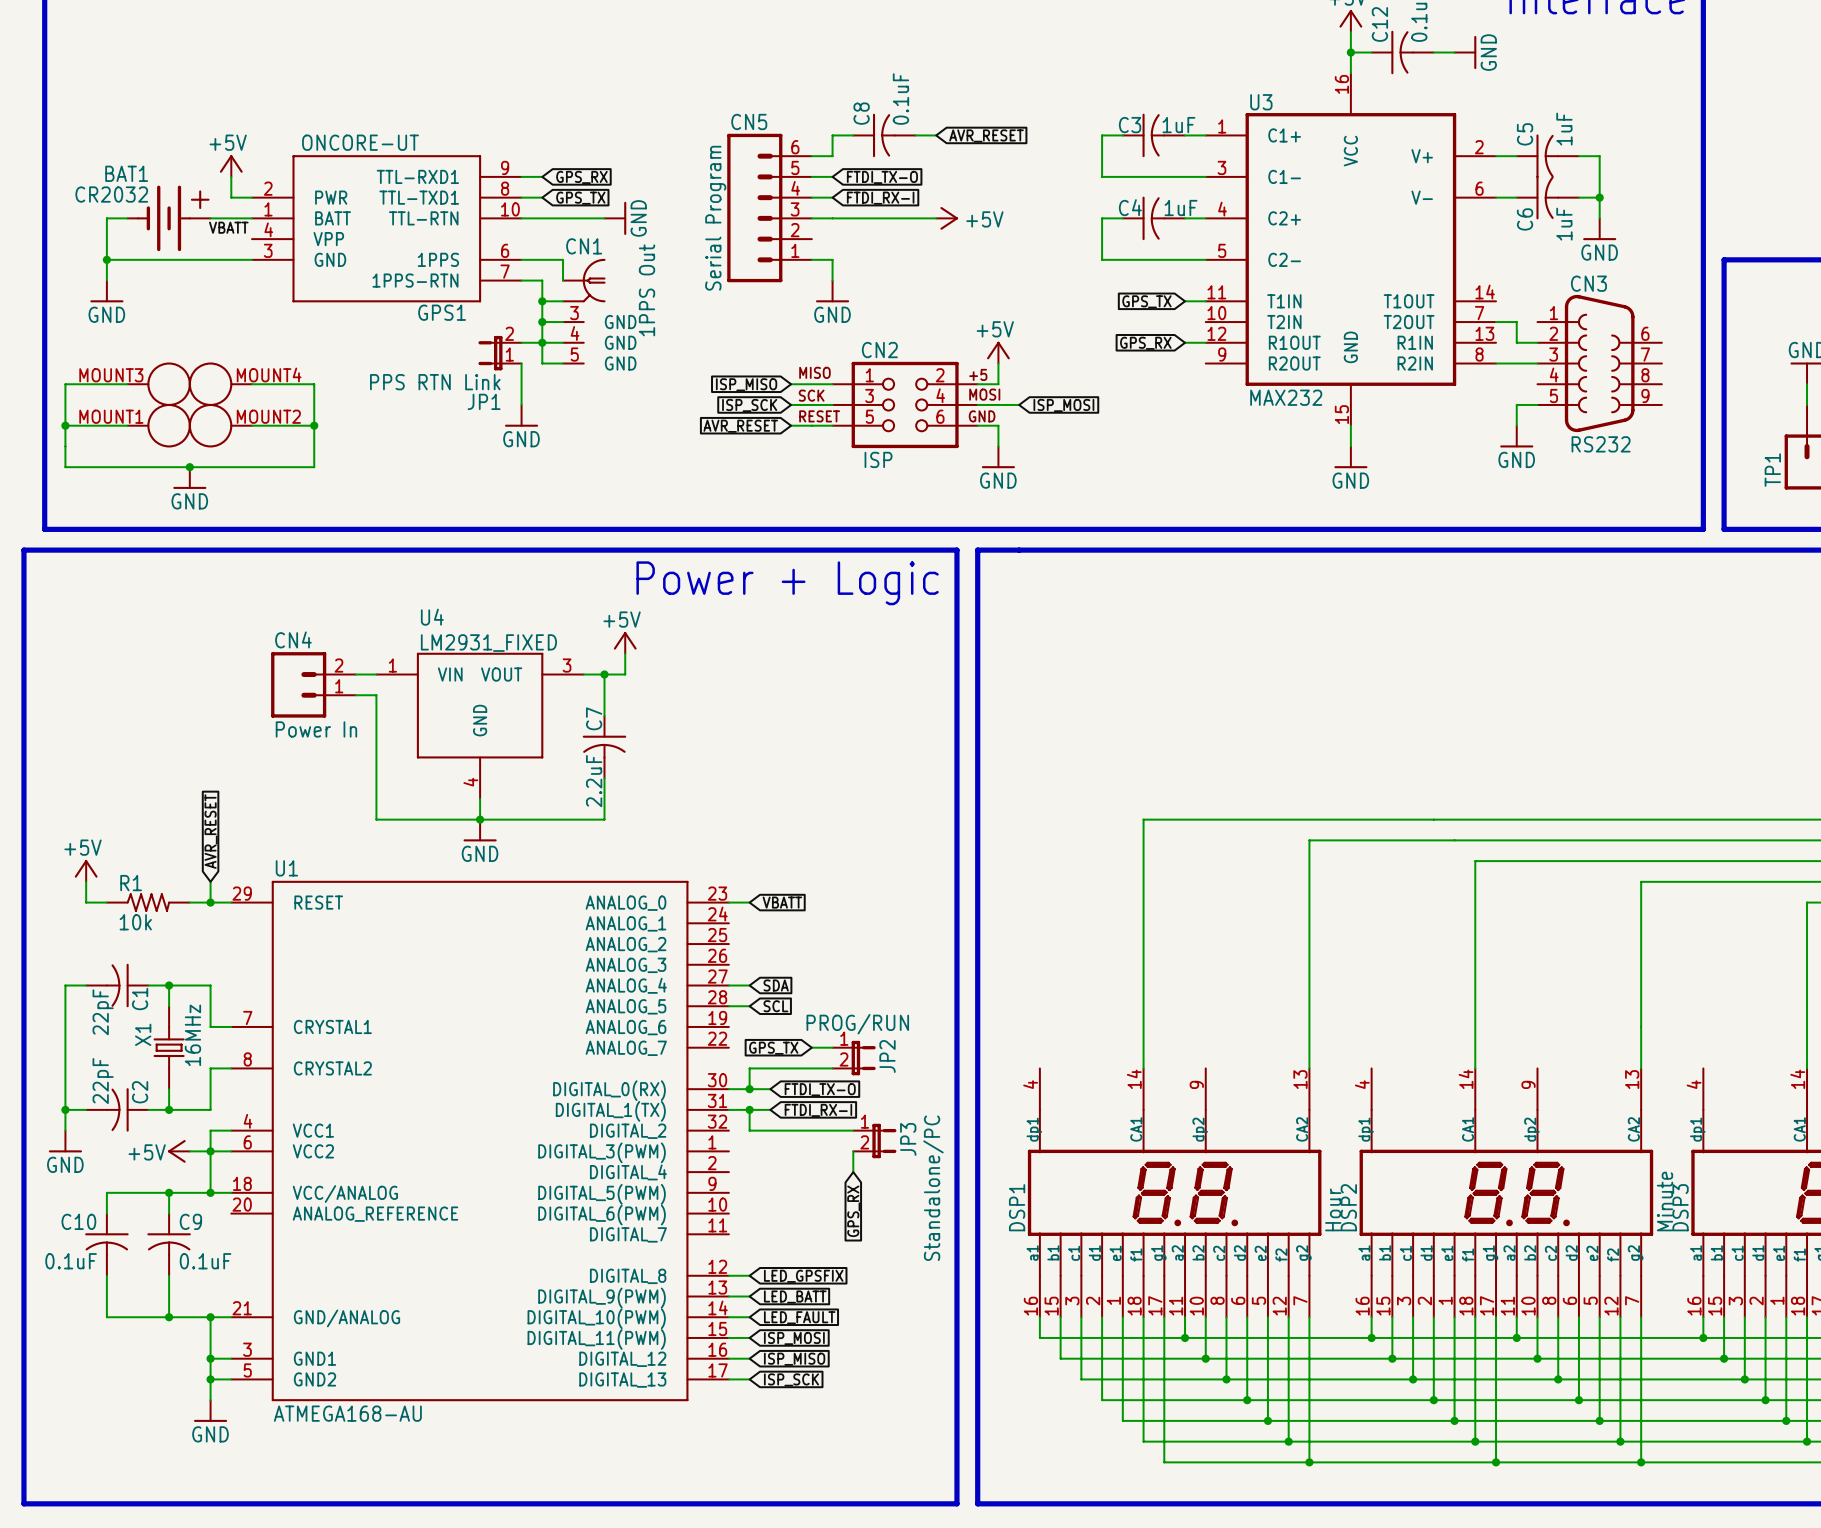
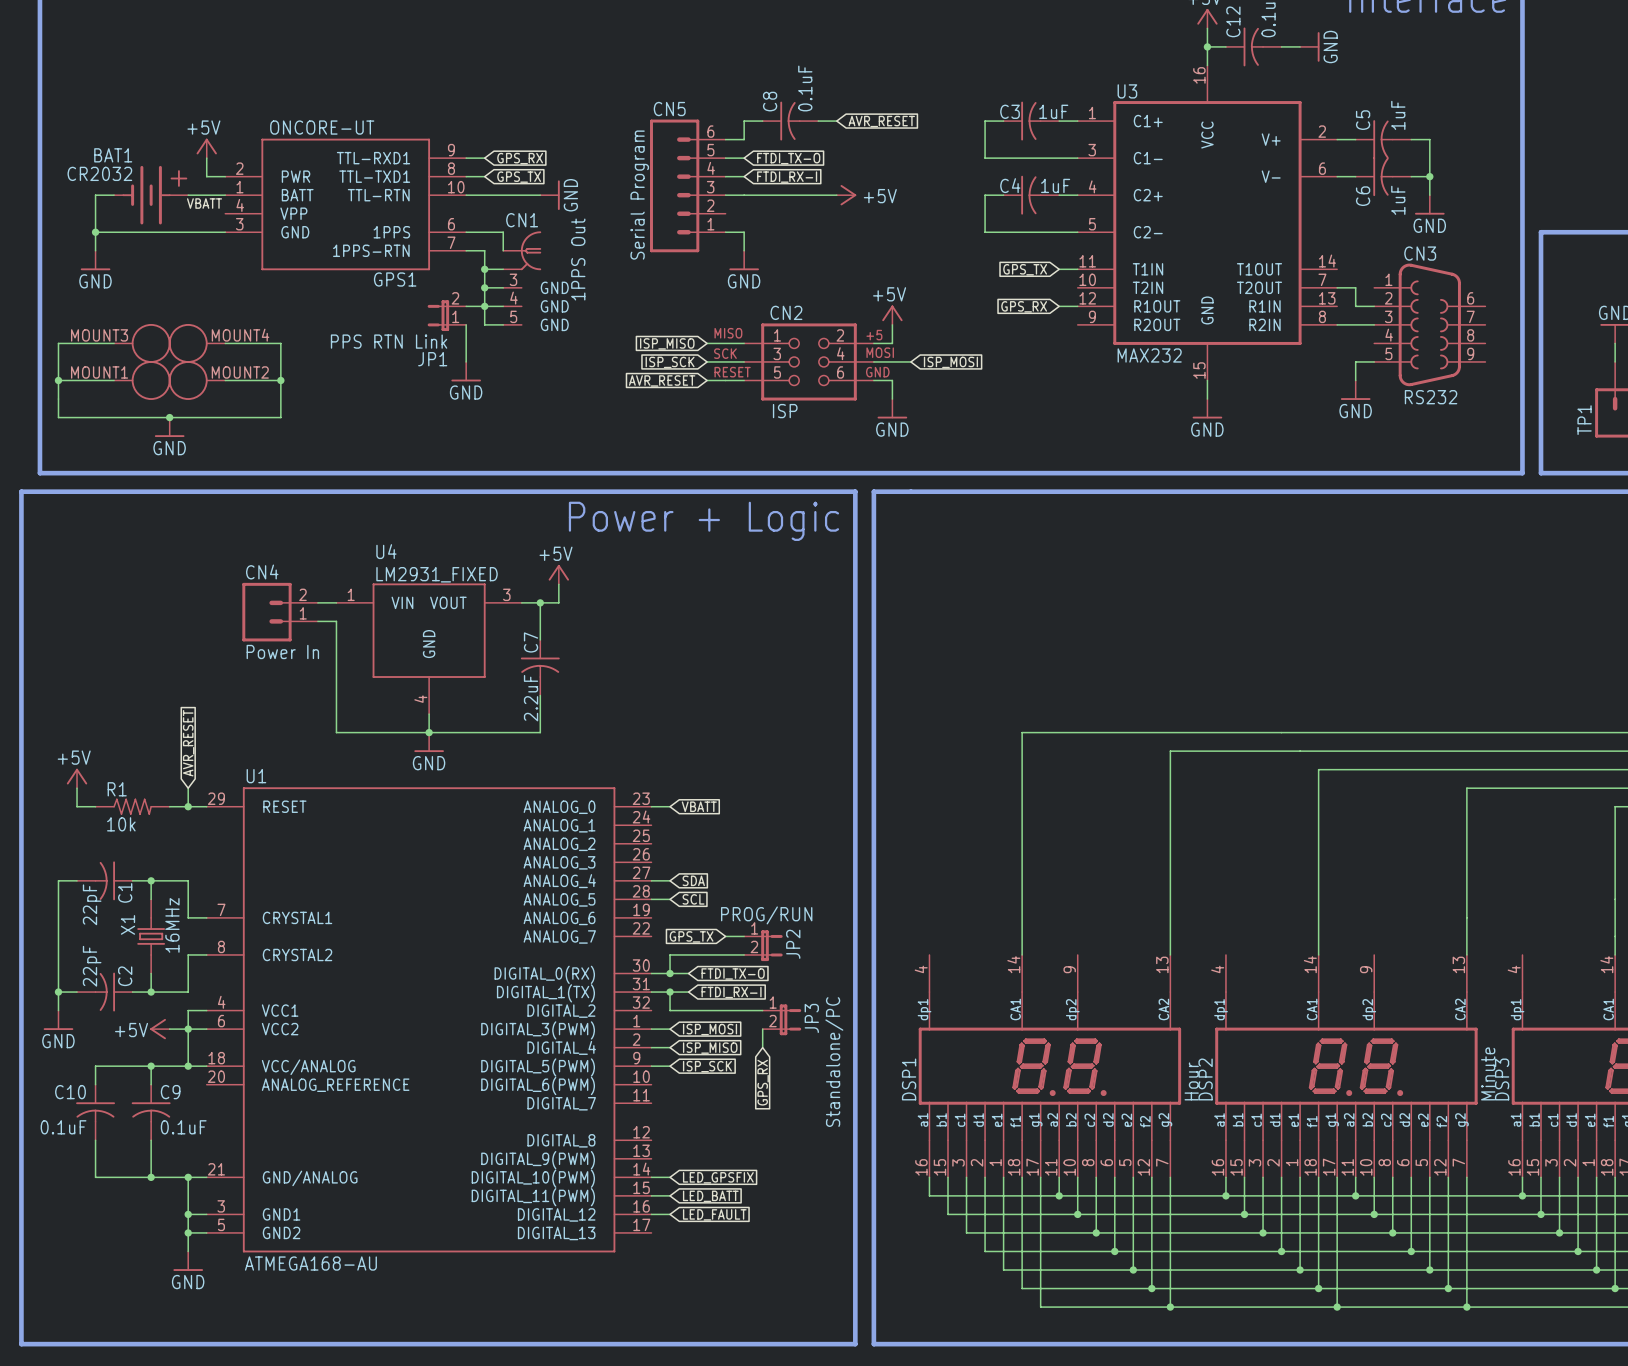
wire: none -> (651, 1029) (670, 1029)
global label: none -> ISP_MOSI (710, 1029)
global label: none -> ISP_MISO (710, 1048)
wire: (728, 1275) (749, 1275) -> (651, 1066) (670, 1066)
global label: LED_GPSFIX (803, 1276) -> none
wire: (728, 1296) (749, 1296) -> (651, 1047) (670, 1047)
global label: LED_BATT (795, 1296) -> none
global label: LED_FAULT (799, 1317) -> LED_GPSFIX (718, 1177)
global label: ISP_MOSI (794, 1338) -> LED_BATT (710, 1196)
global label: ISP_MISO (794, 1359) -> LED_FAULT (714, 1214)
wire: (728, 1379) (749, 1379) -> none
global label position: ISP_SCK (791, 1379) -> ISP_SCK (707, 1066)

